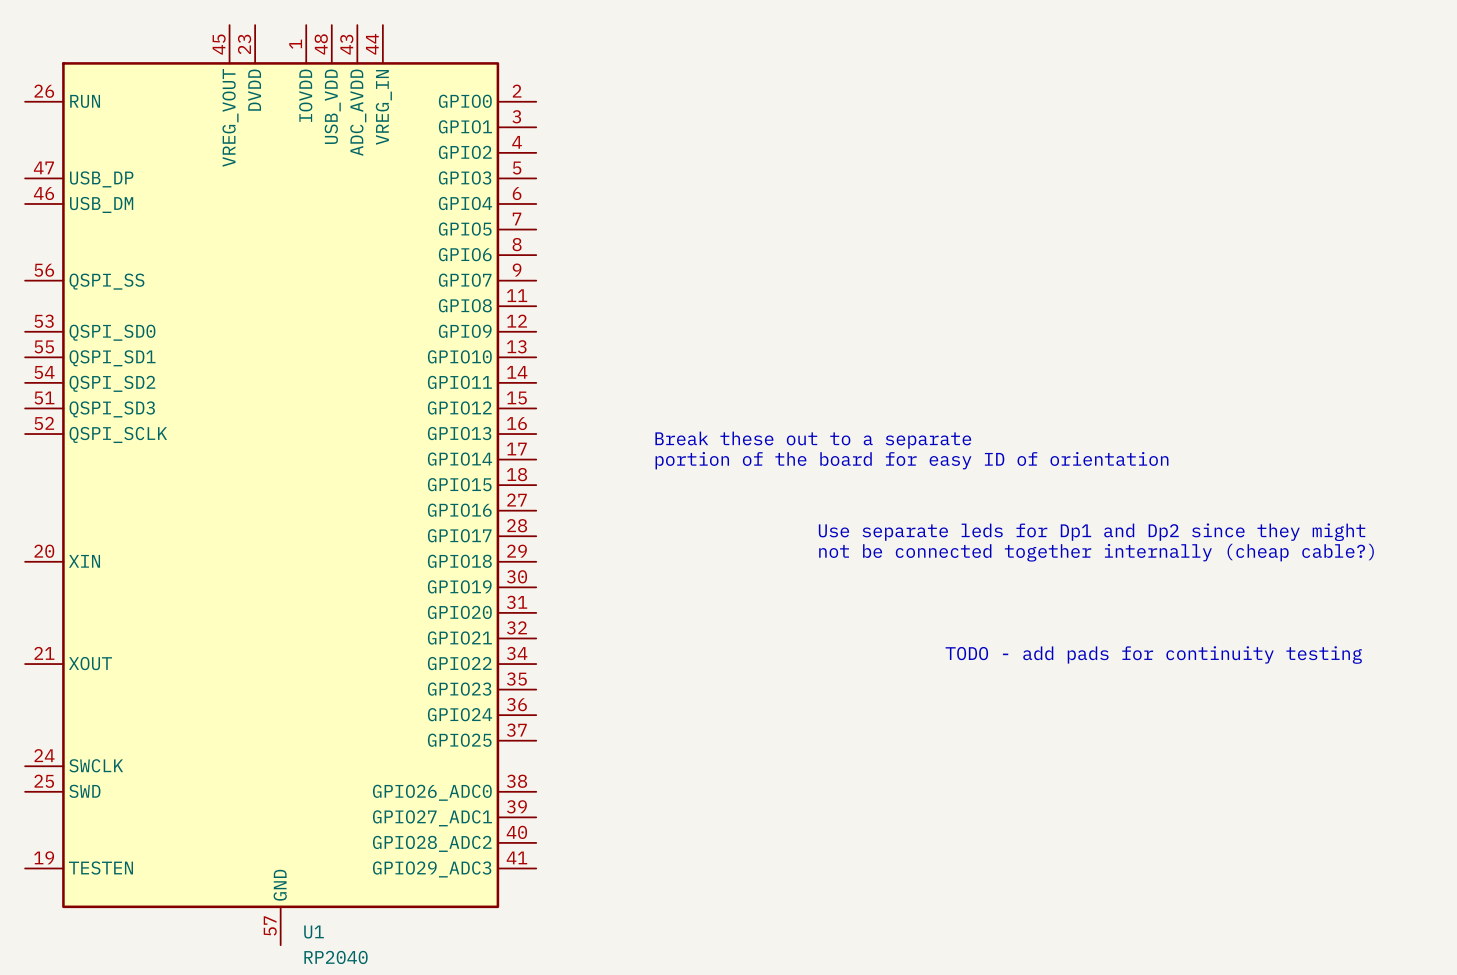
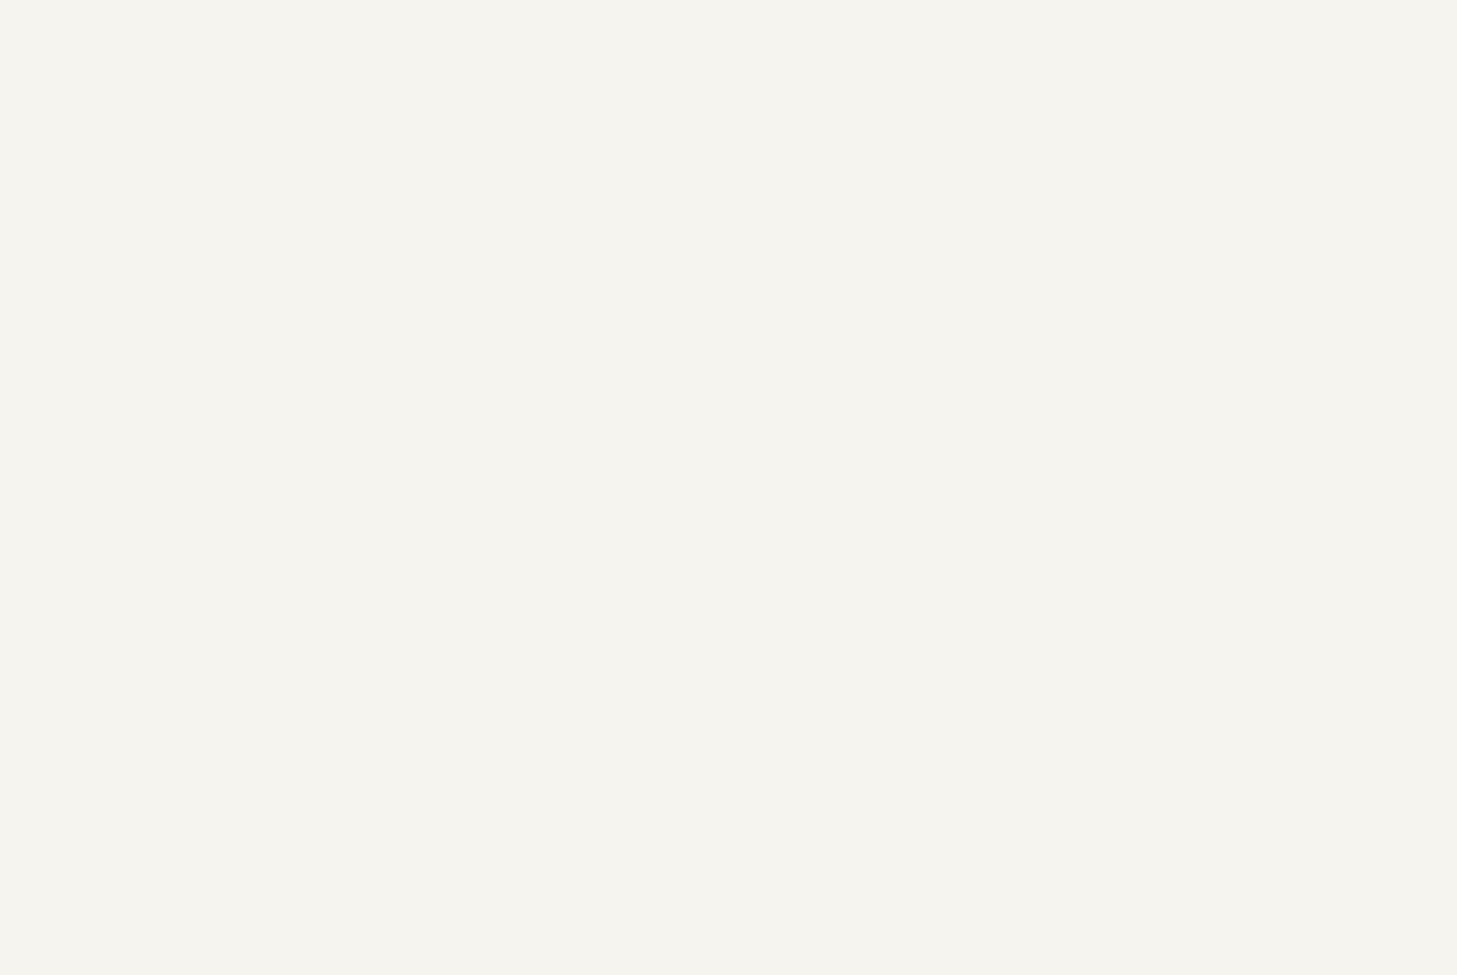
text: Break these out to a separate (813, 440) -> none
text: portion of the board for easy ID of orientation (911, 460) -> none
U1: RP2040 (280, 485) -> none
text: Use separate leds for Dp1 and Dp2 since they might (1092, 532) -> none
text: not be connected together internally (cheap cable?) (1096, 552) -> none
text: TODO - add pads for continuity testing (1153, 655) -> none

